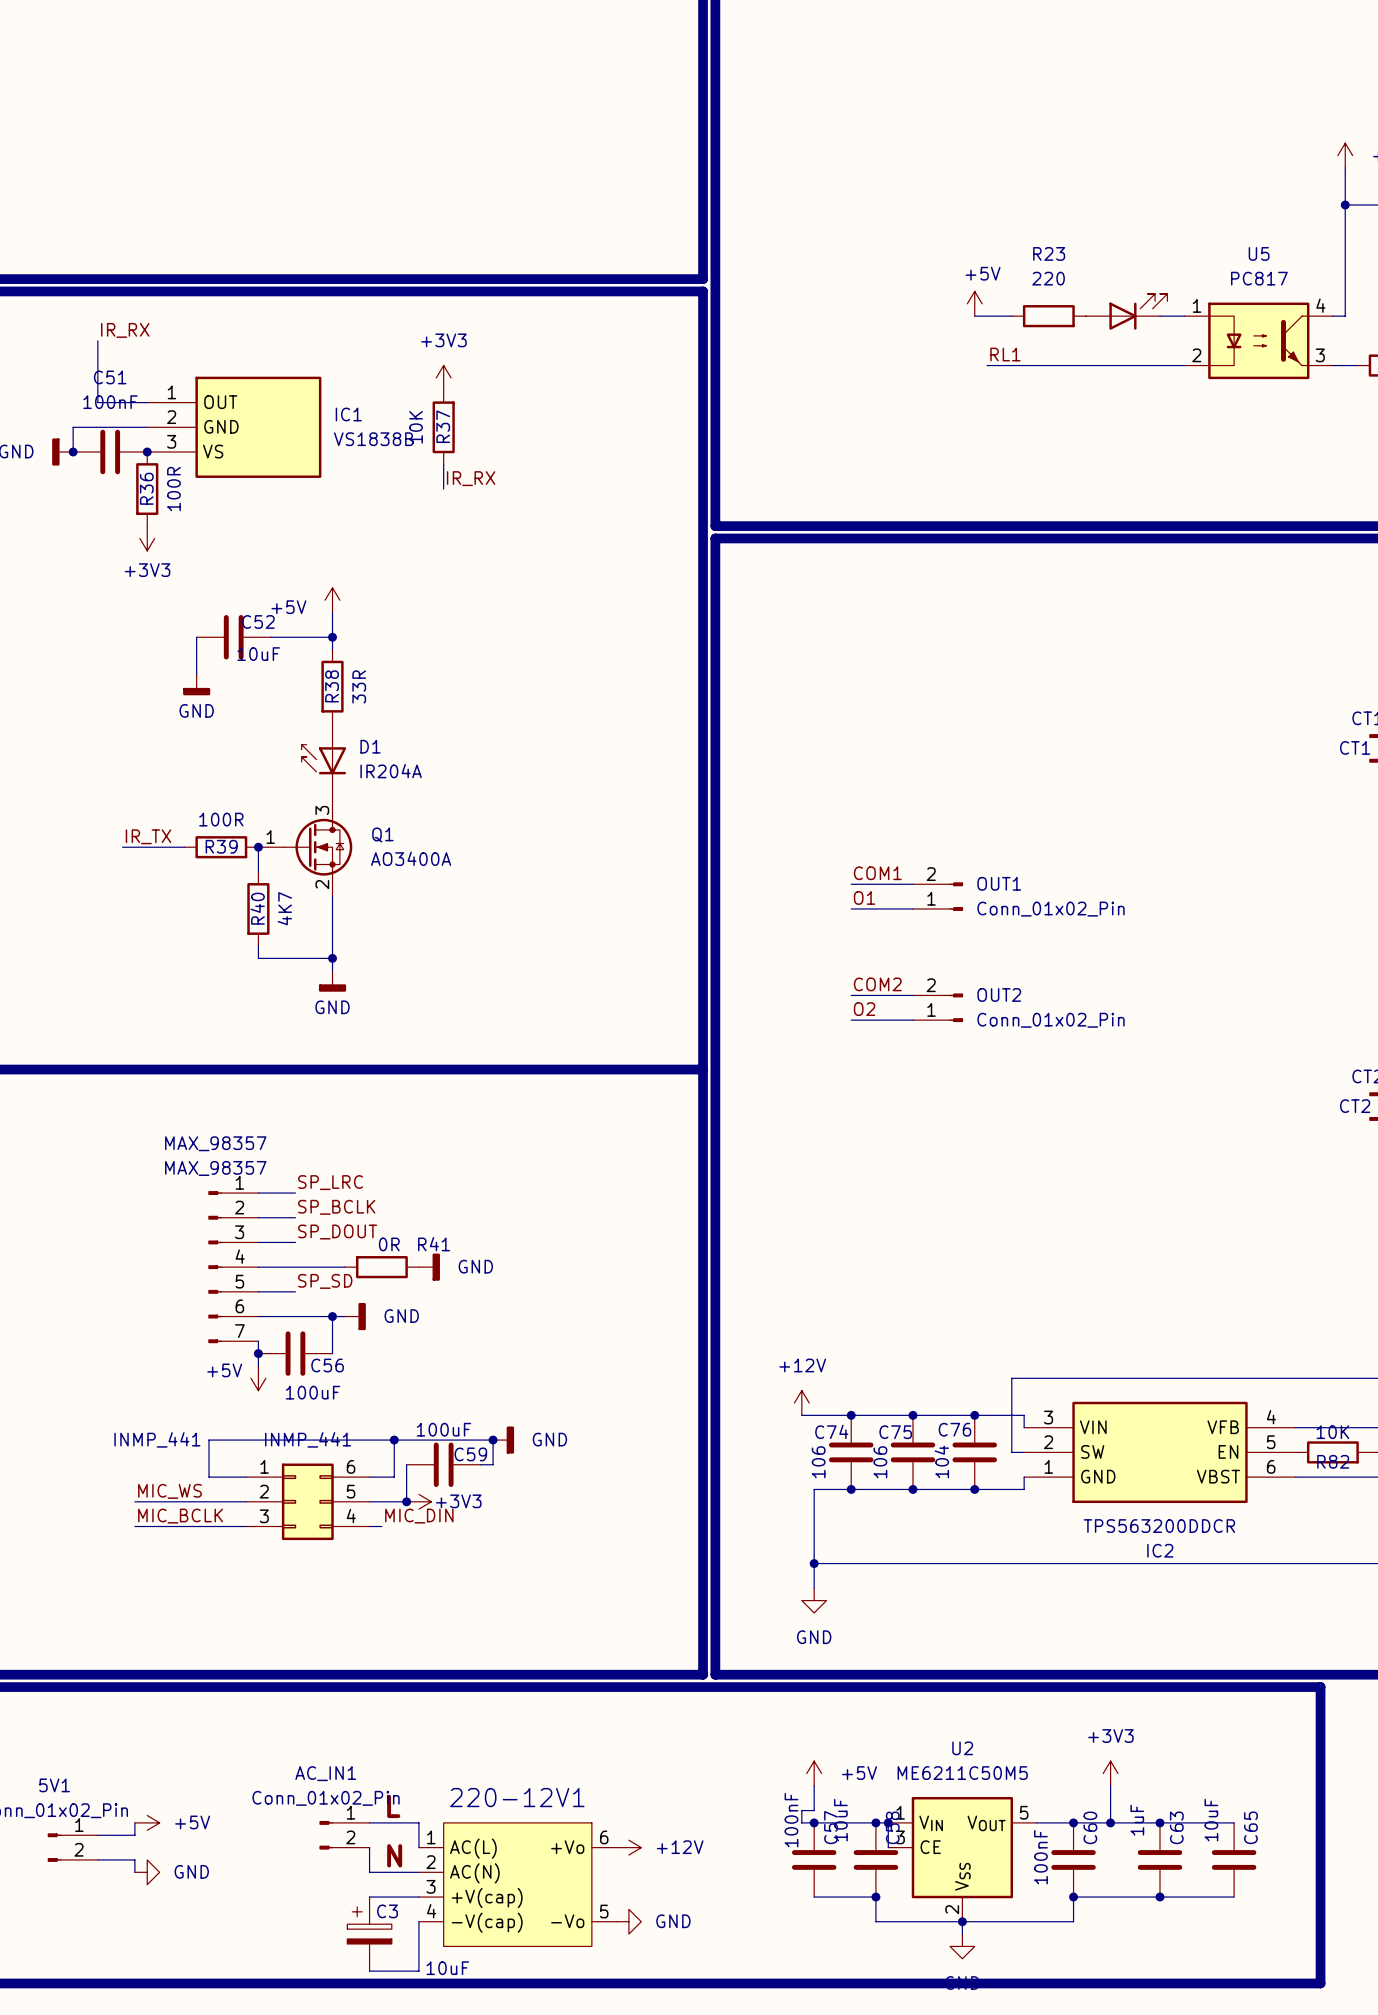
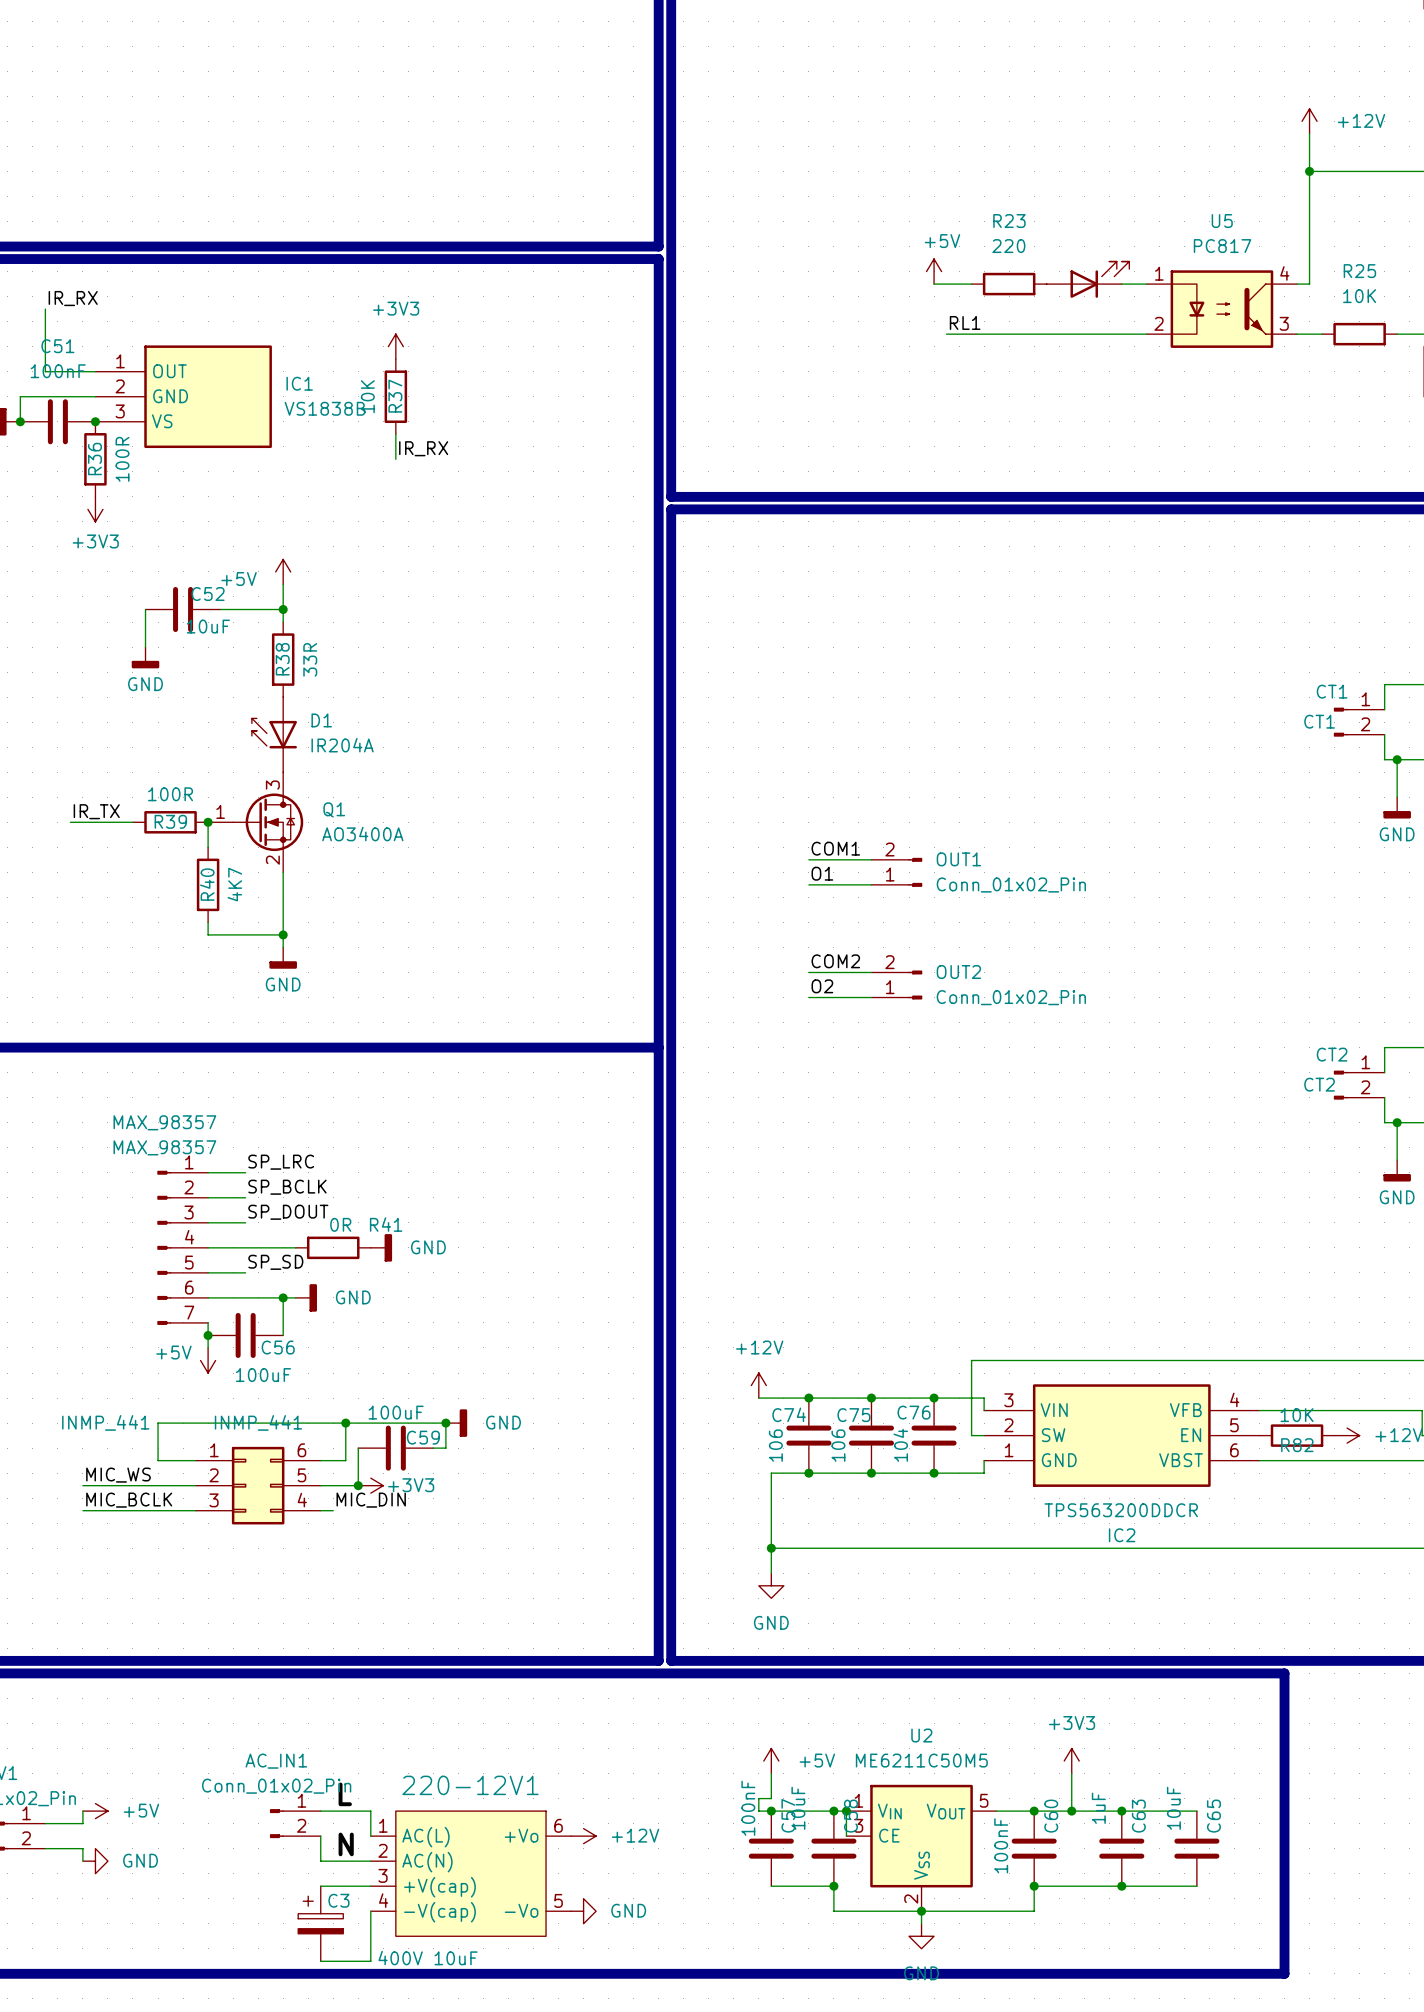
C3 value: 10uF (447, 1968) -> 400V 10uF (428, 1958)

